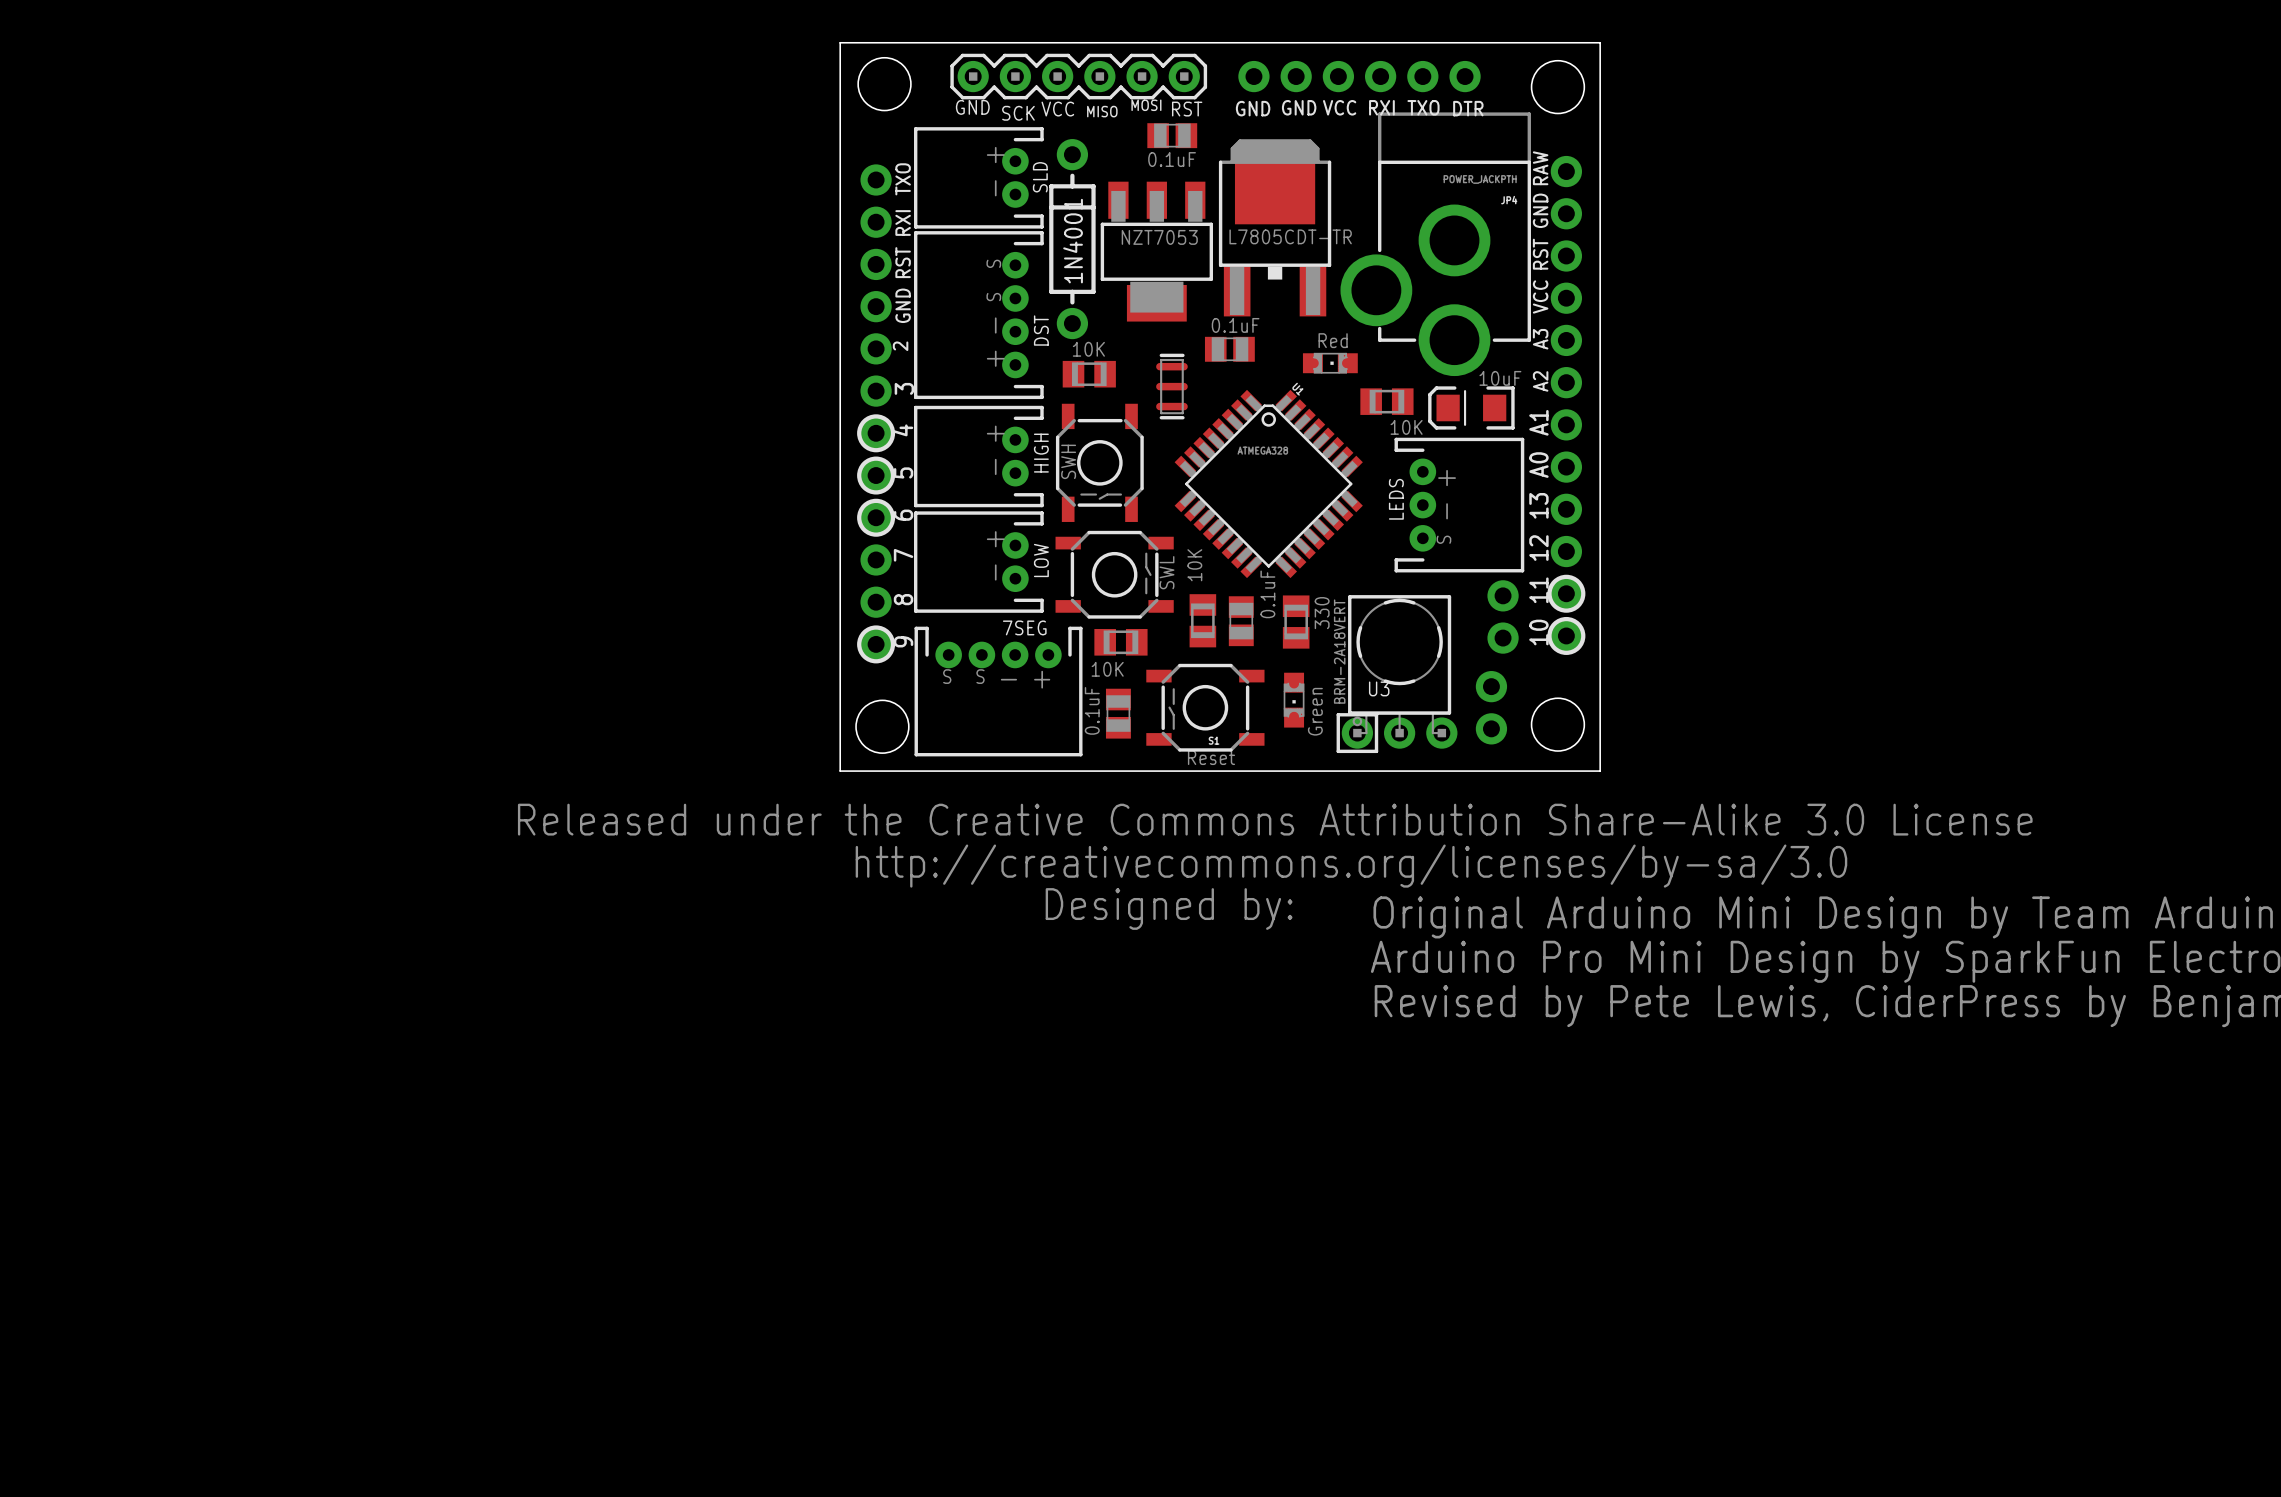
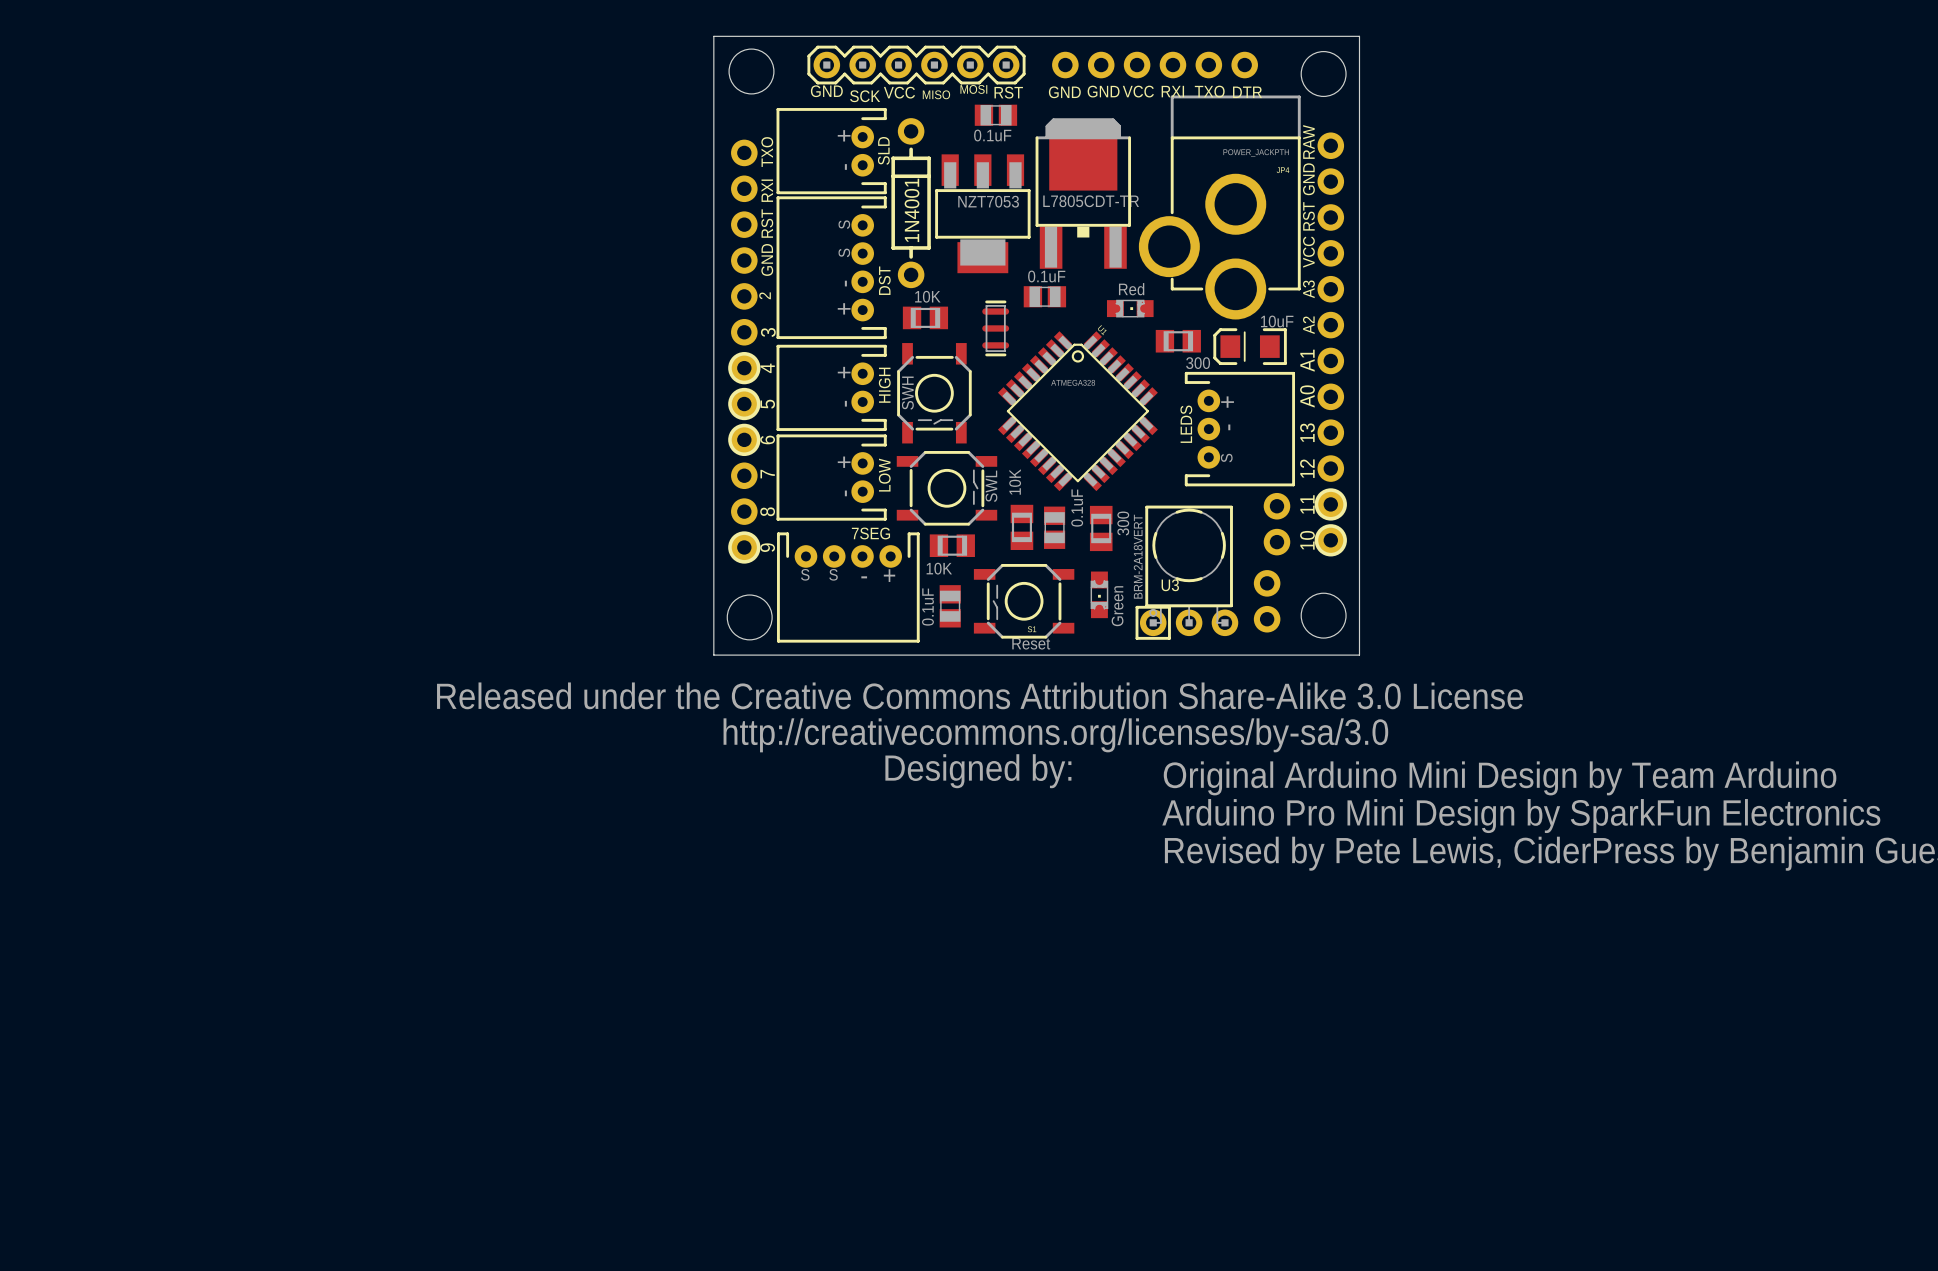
part value: 10K (1406, 427) -> 300 (1198, 363)
part value: 330 (1322, 613) -> 300 (1123, 523)

